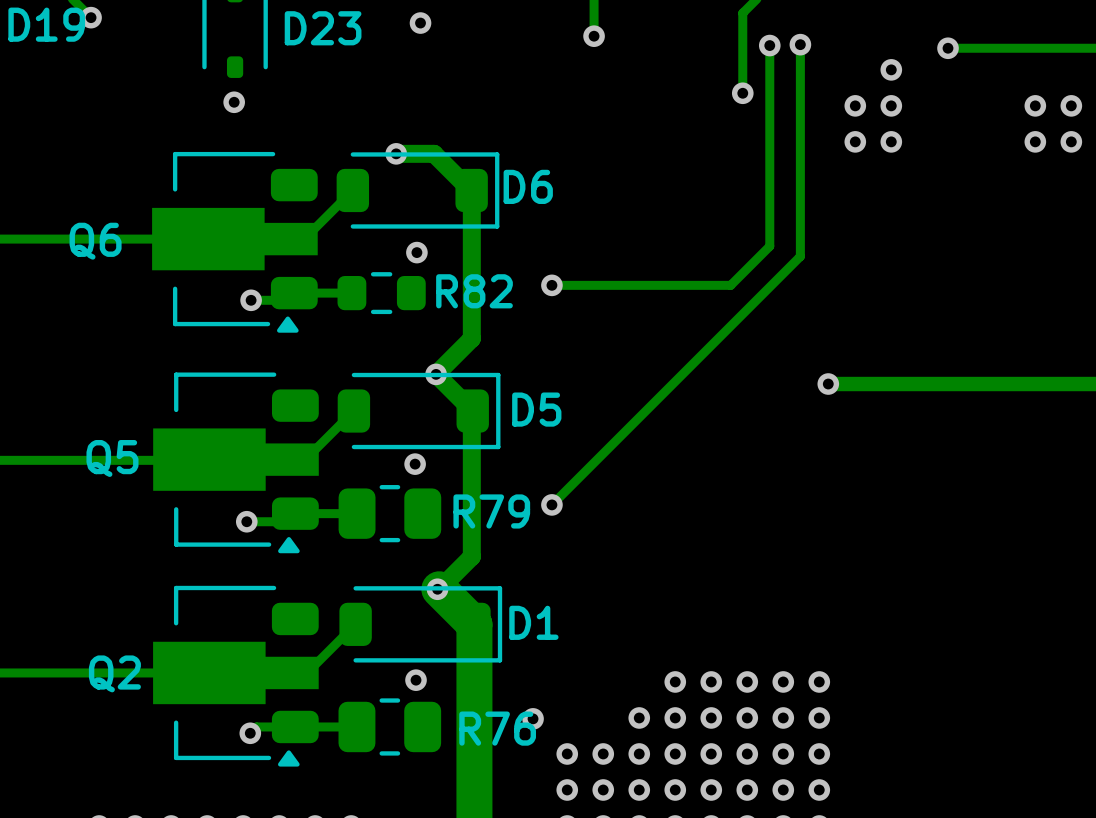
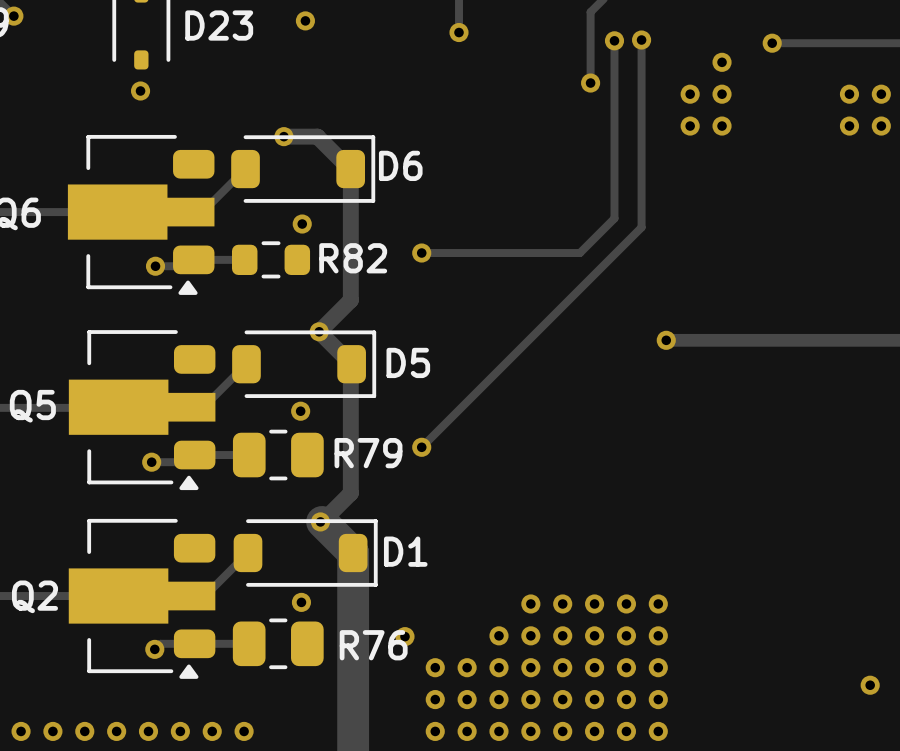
via: none -> (870, 685)

